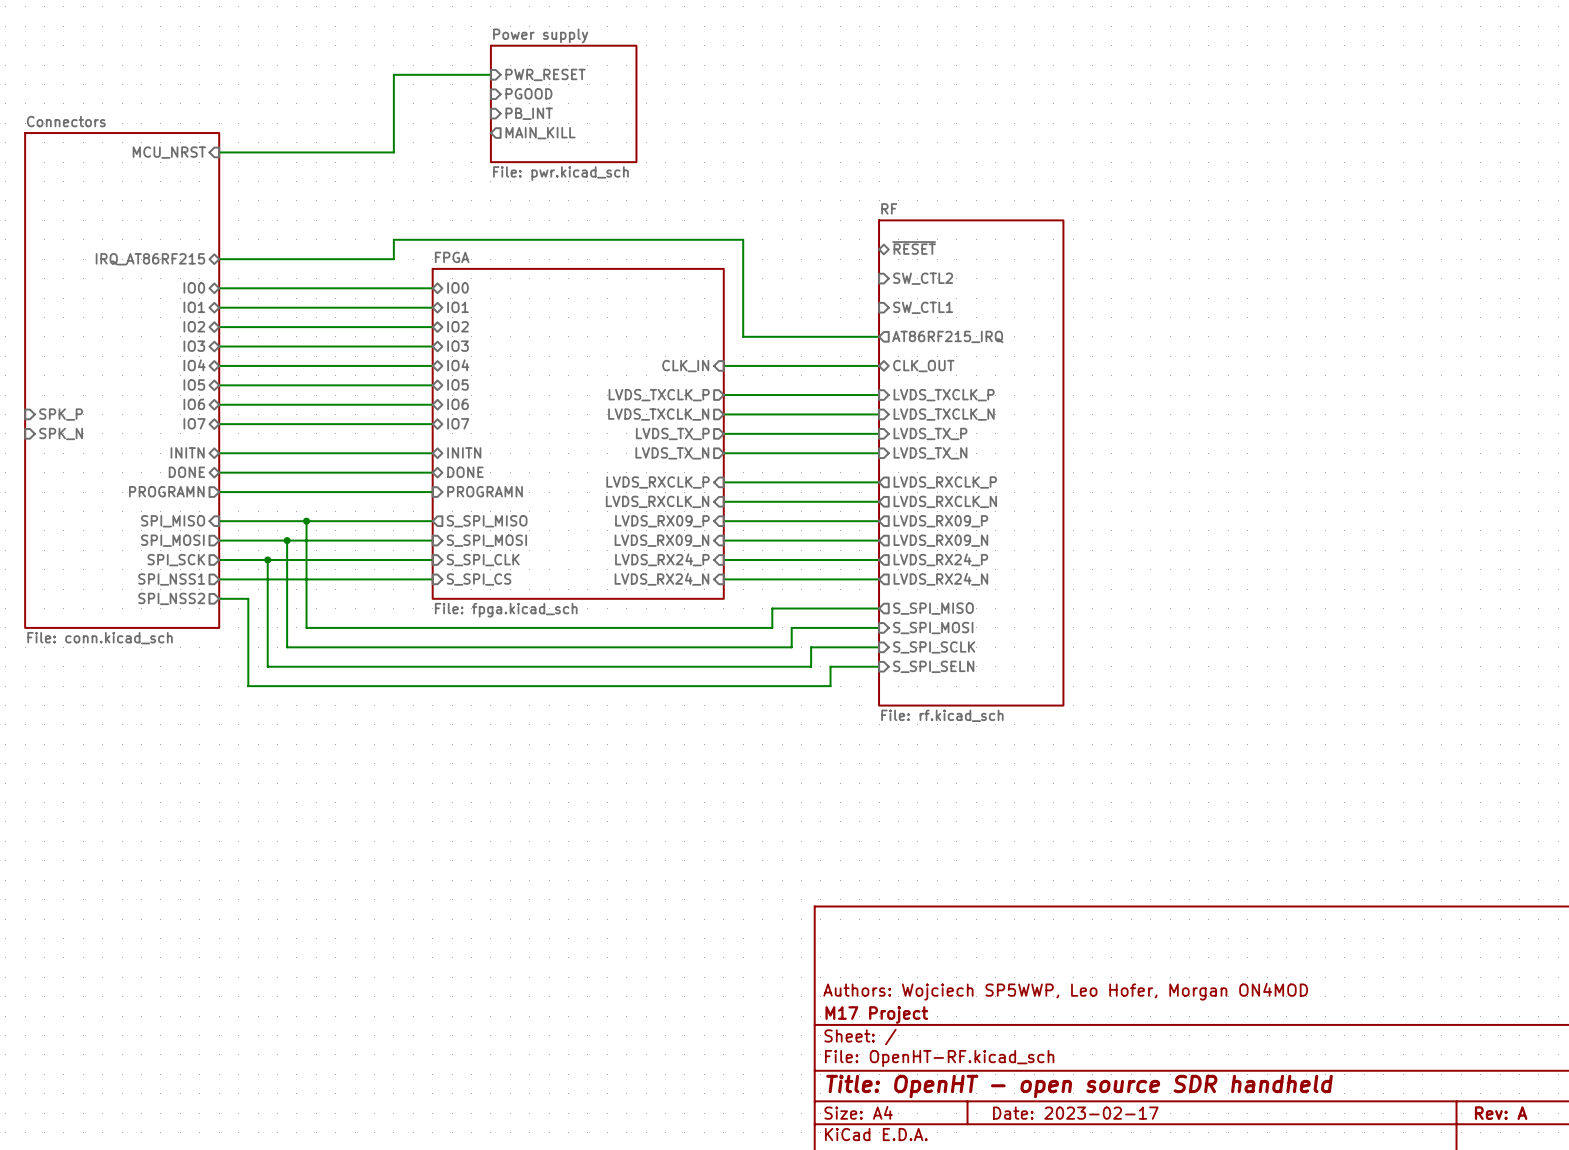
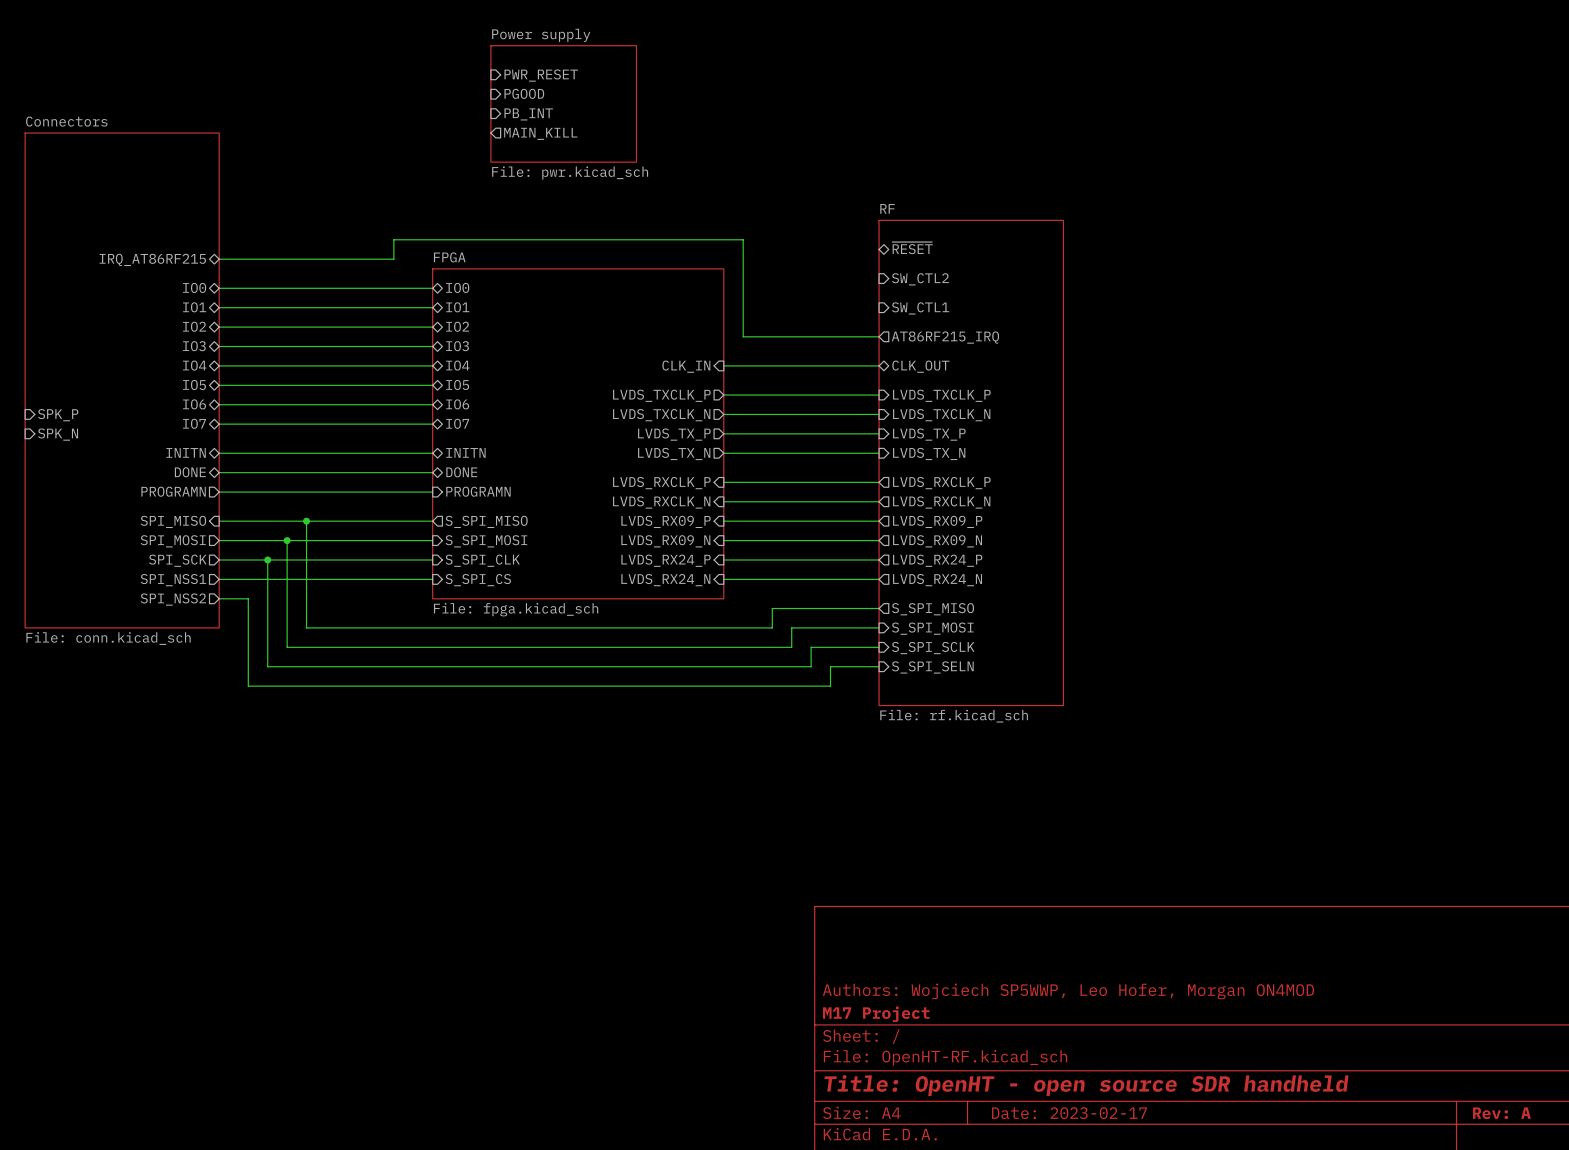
wire: (490, 74) (393, 74) (393, 152) (219, 152) -> none
sheet pin: MCU_NRST (169, 152) -> none

